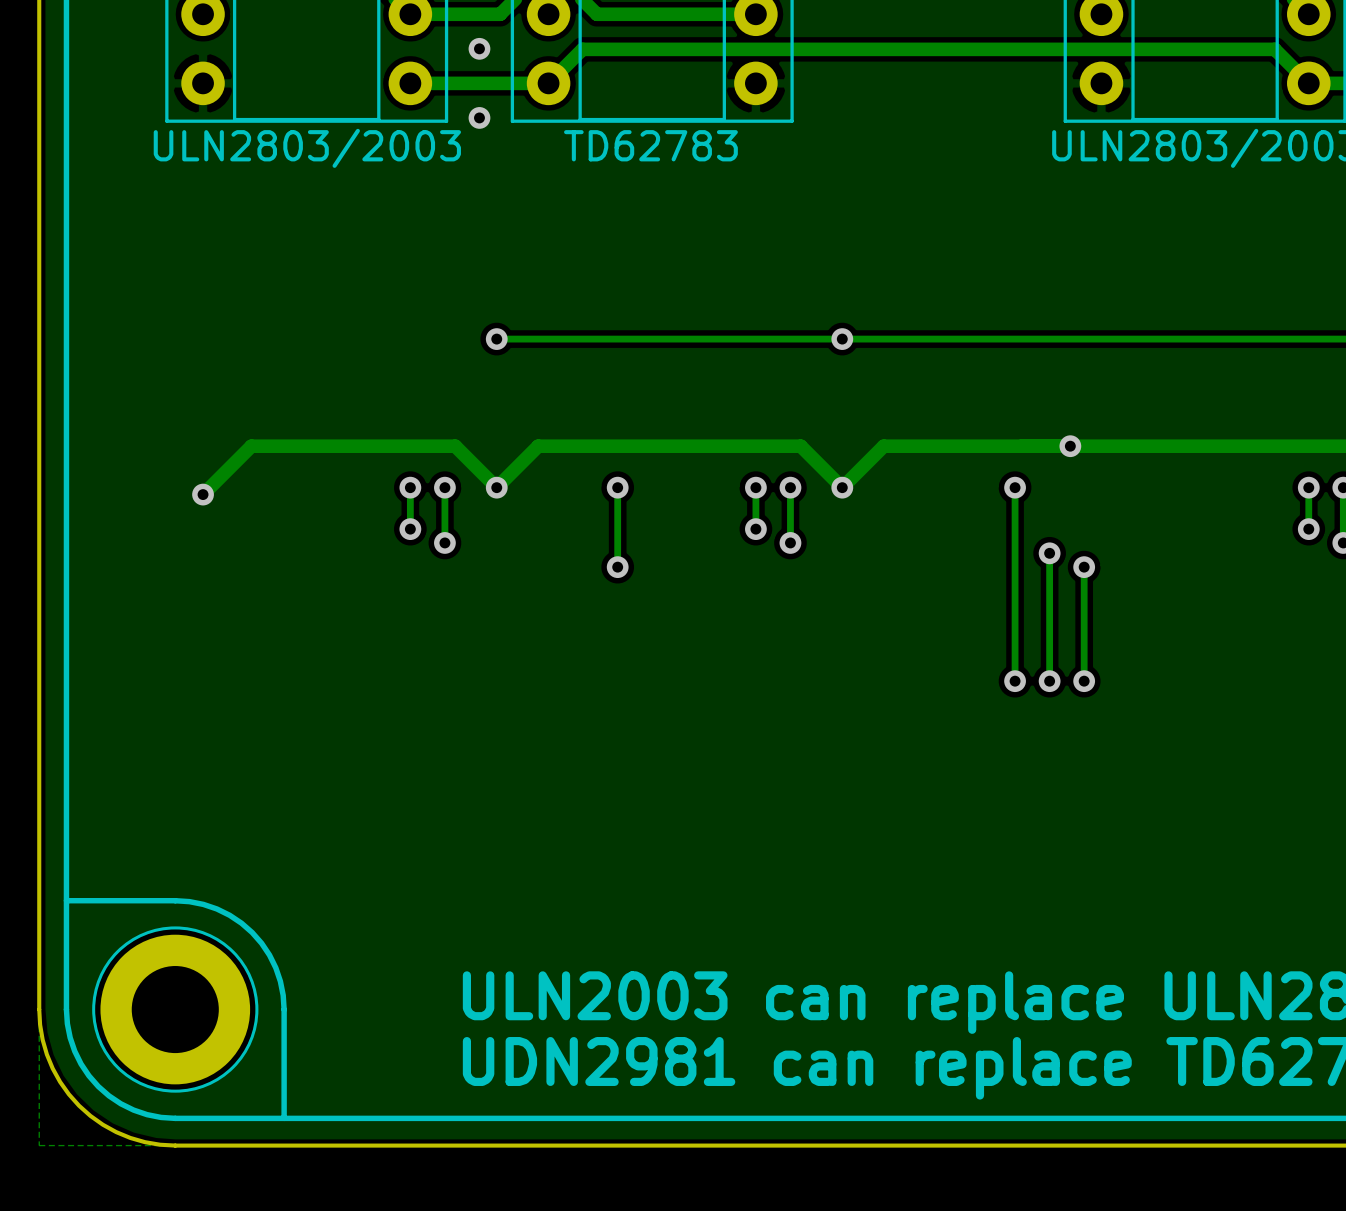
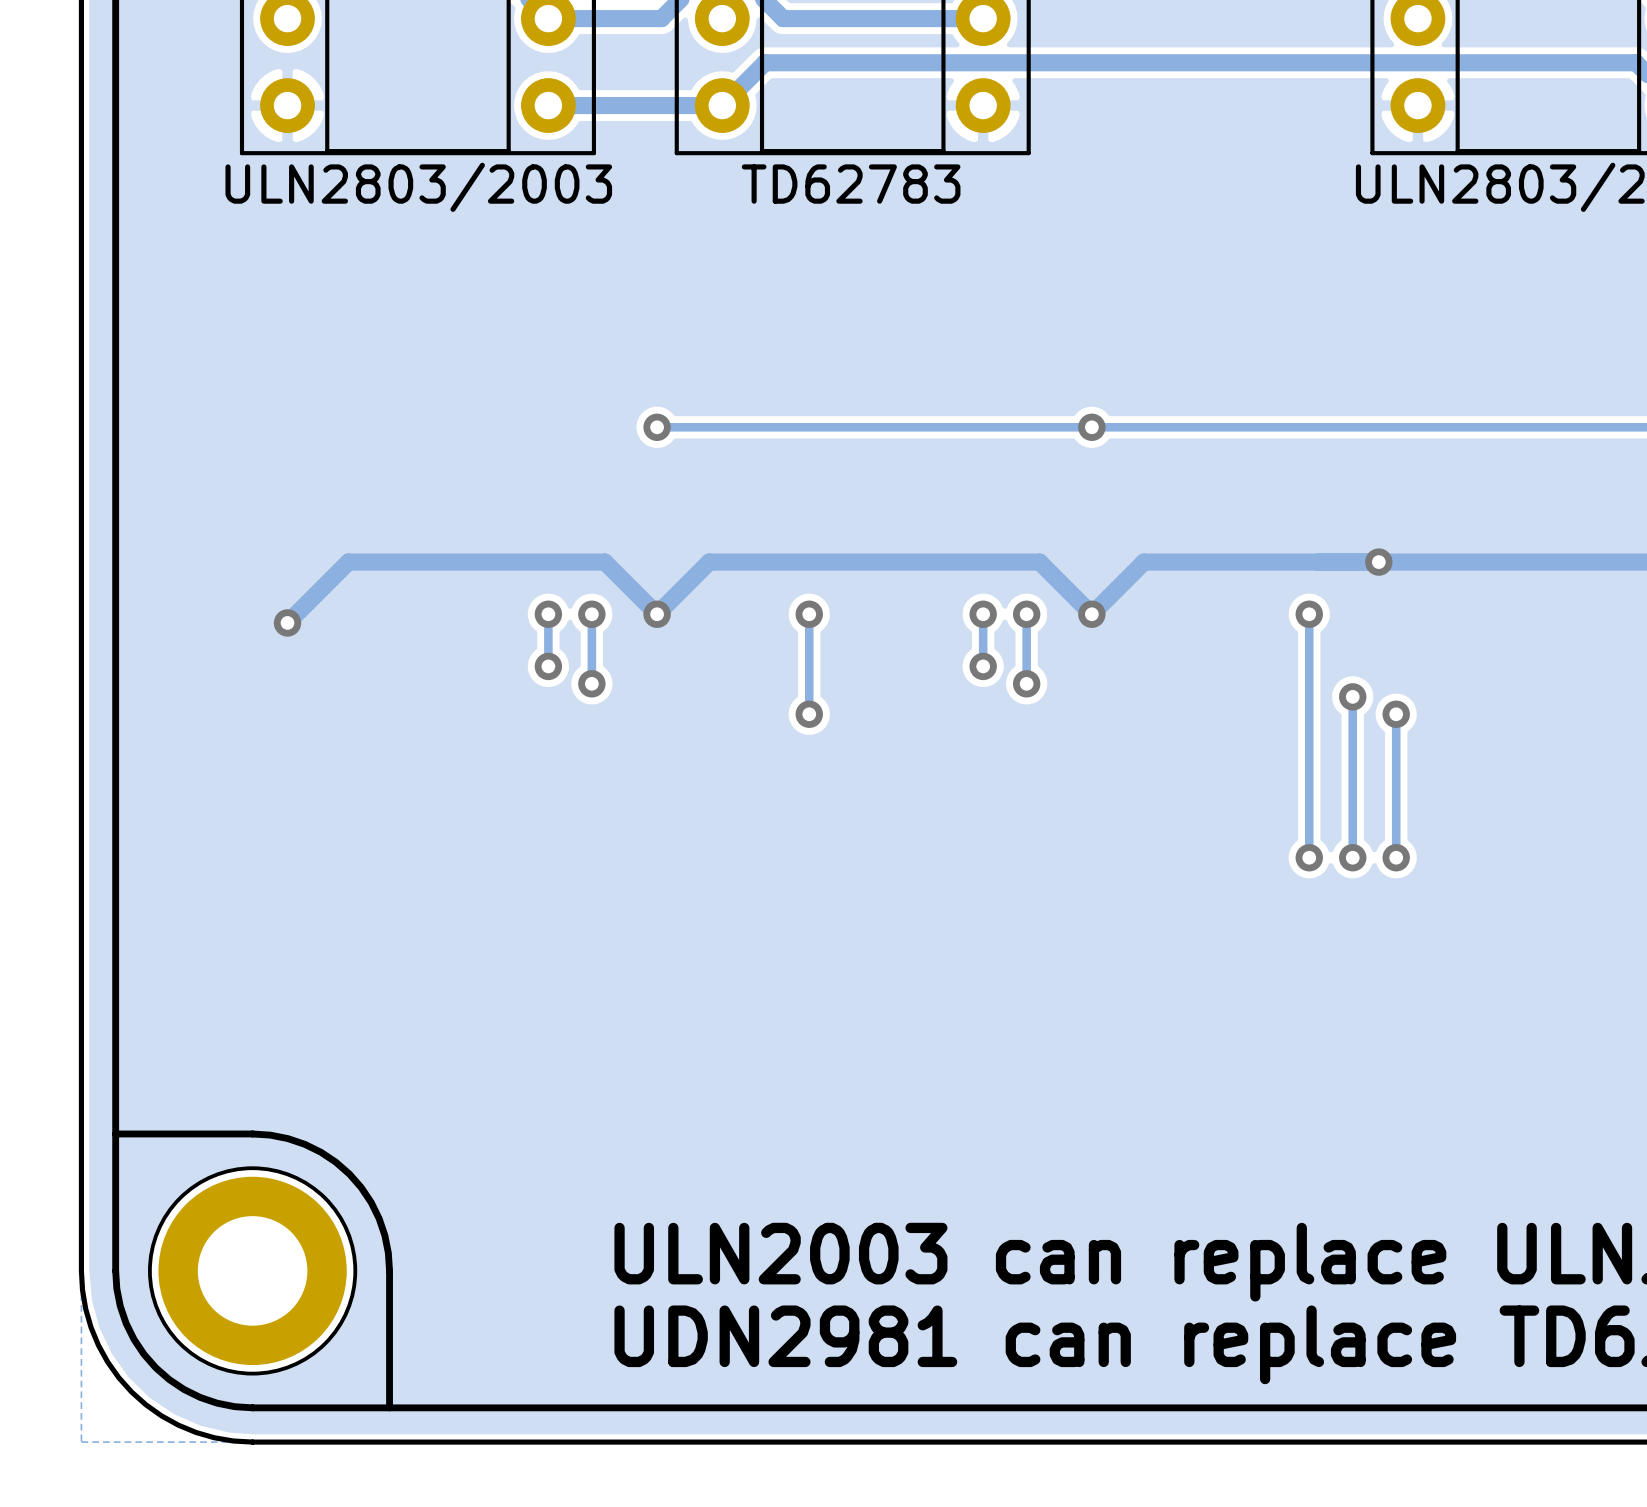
via: (479, 48) -> none
via: (479, 117) -> none

